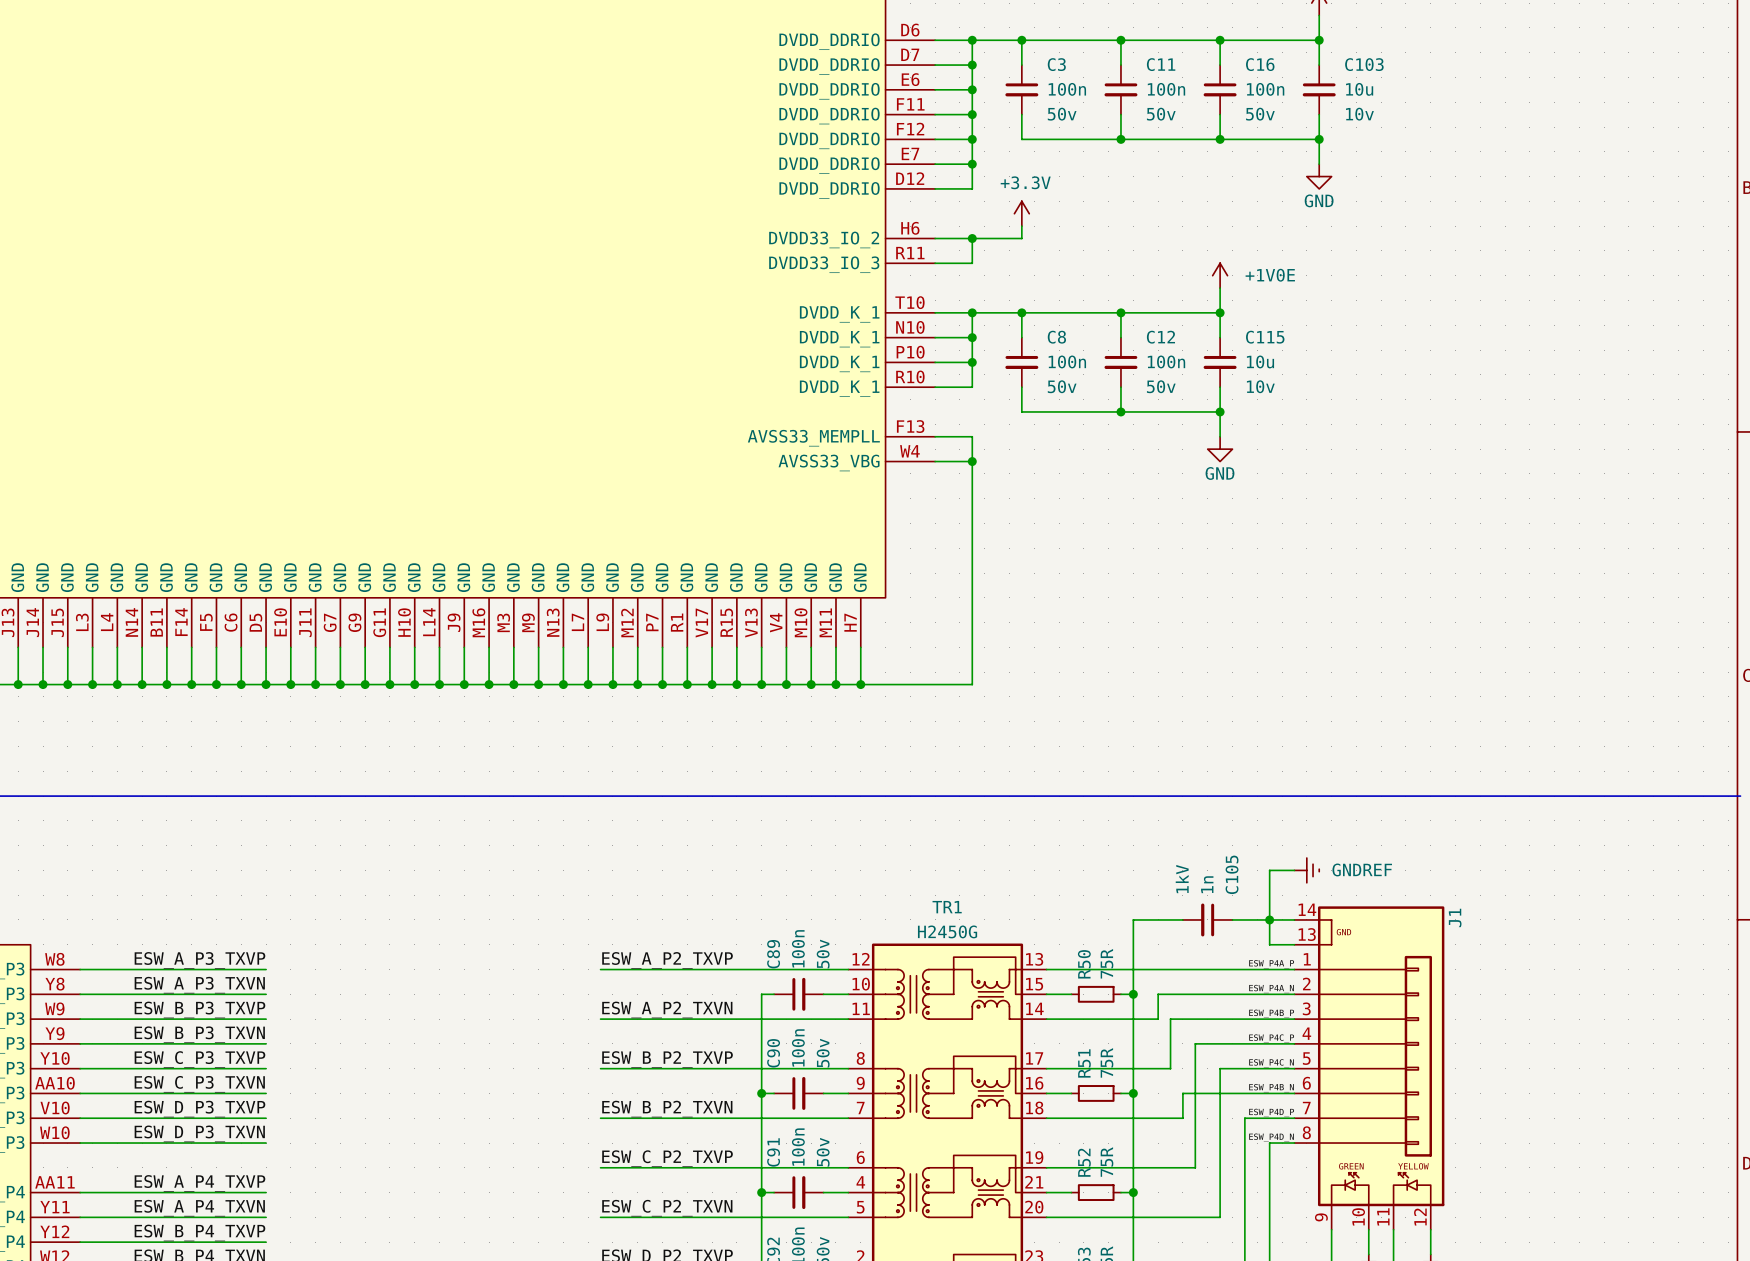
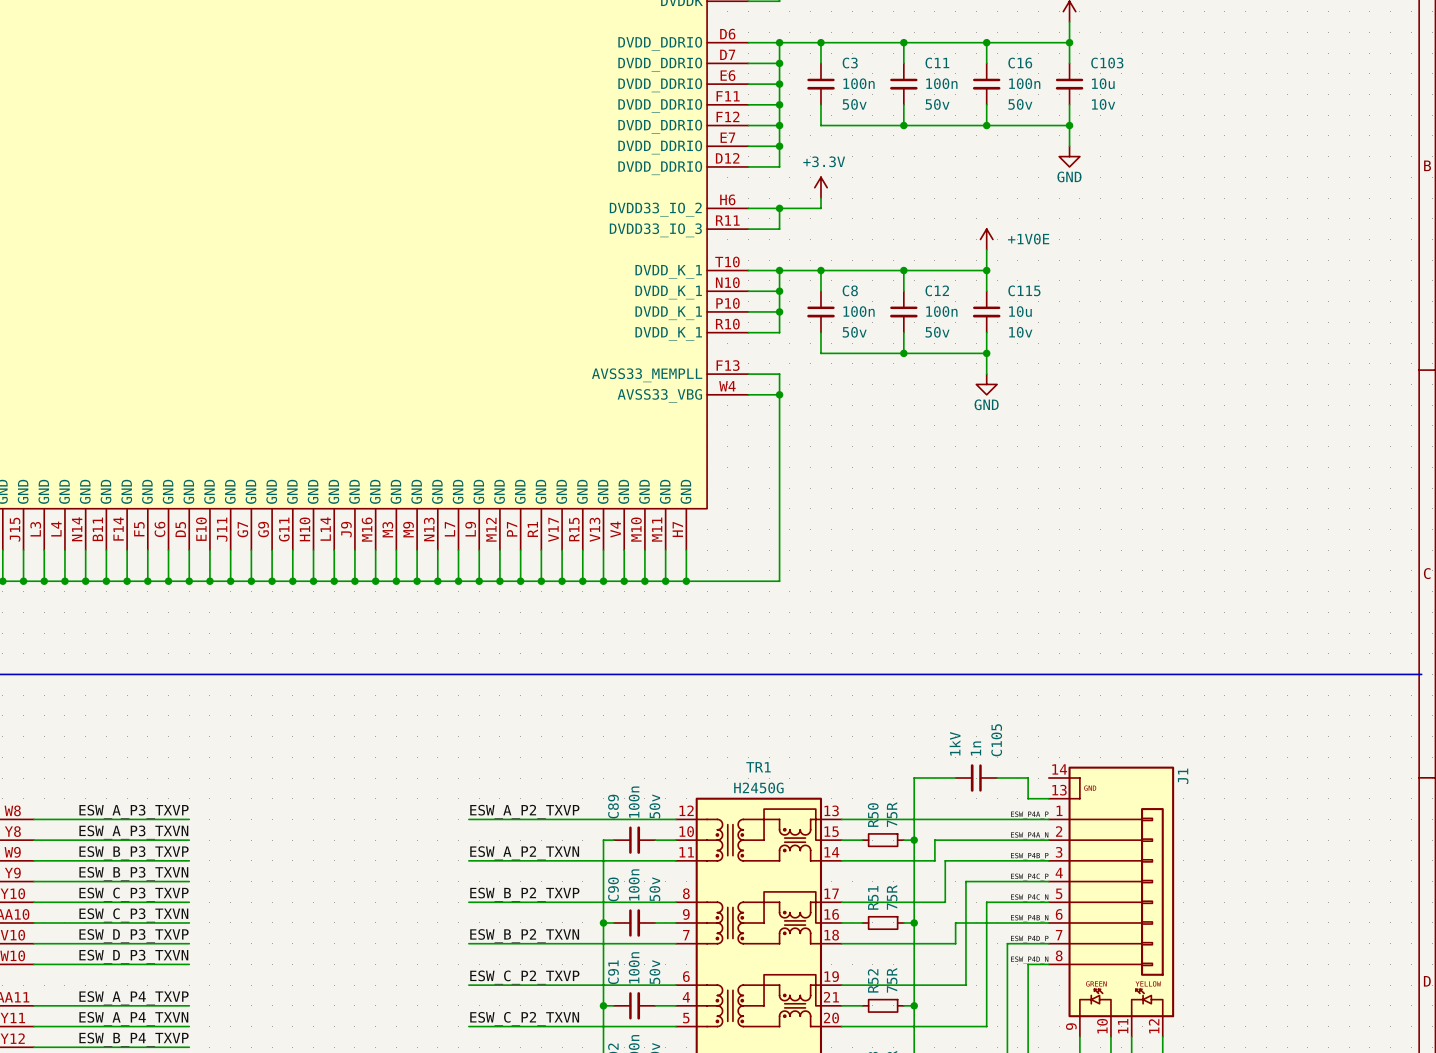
wire: (1294, 870) (1269, 870) (1269, 919) (1294, 919) -> none
power symbol: GNDREF (1306, 870) -> none
junction: (1269, 919) -> none

